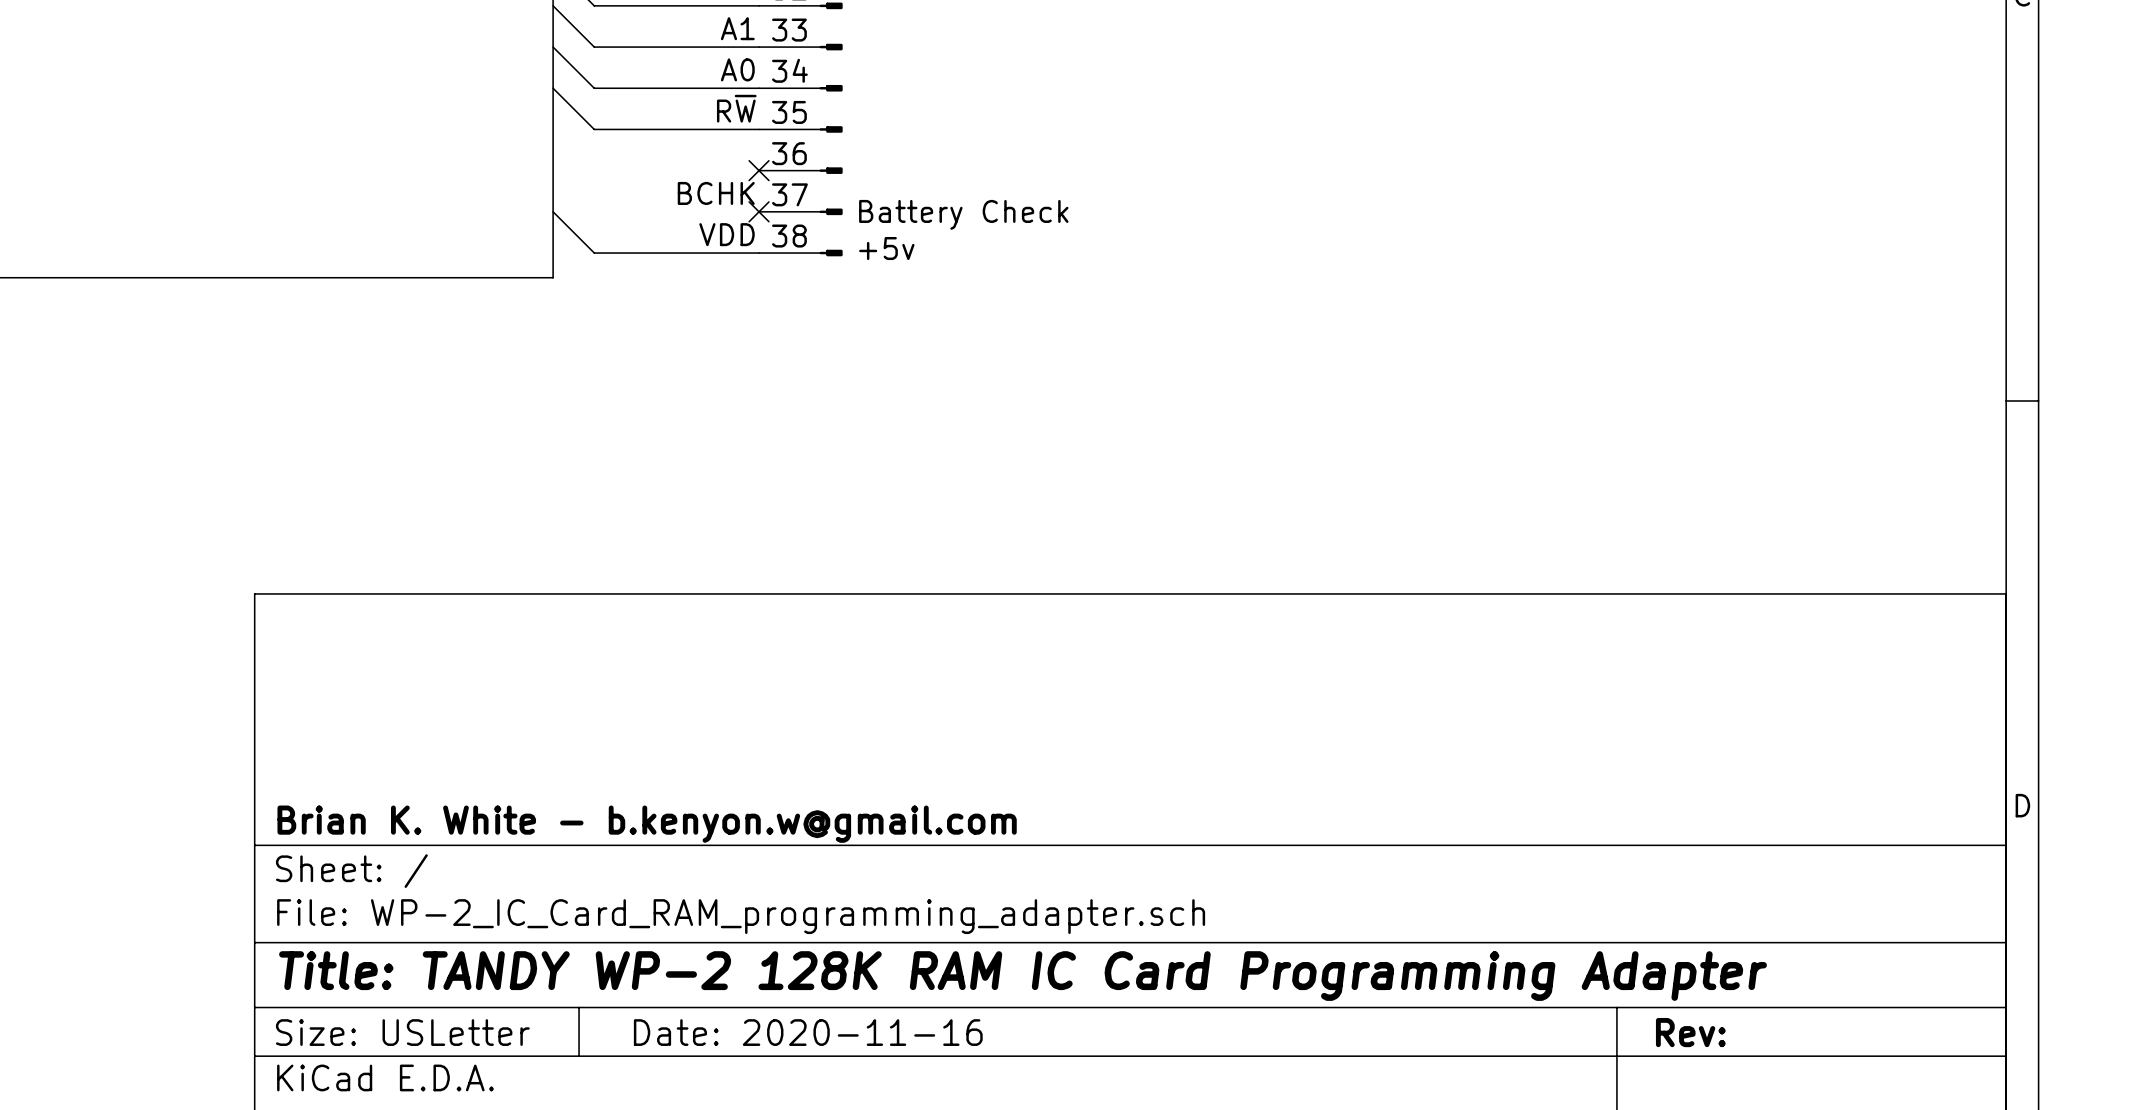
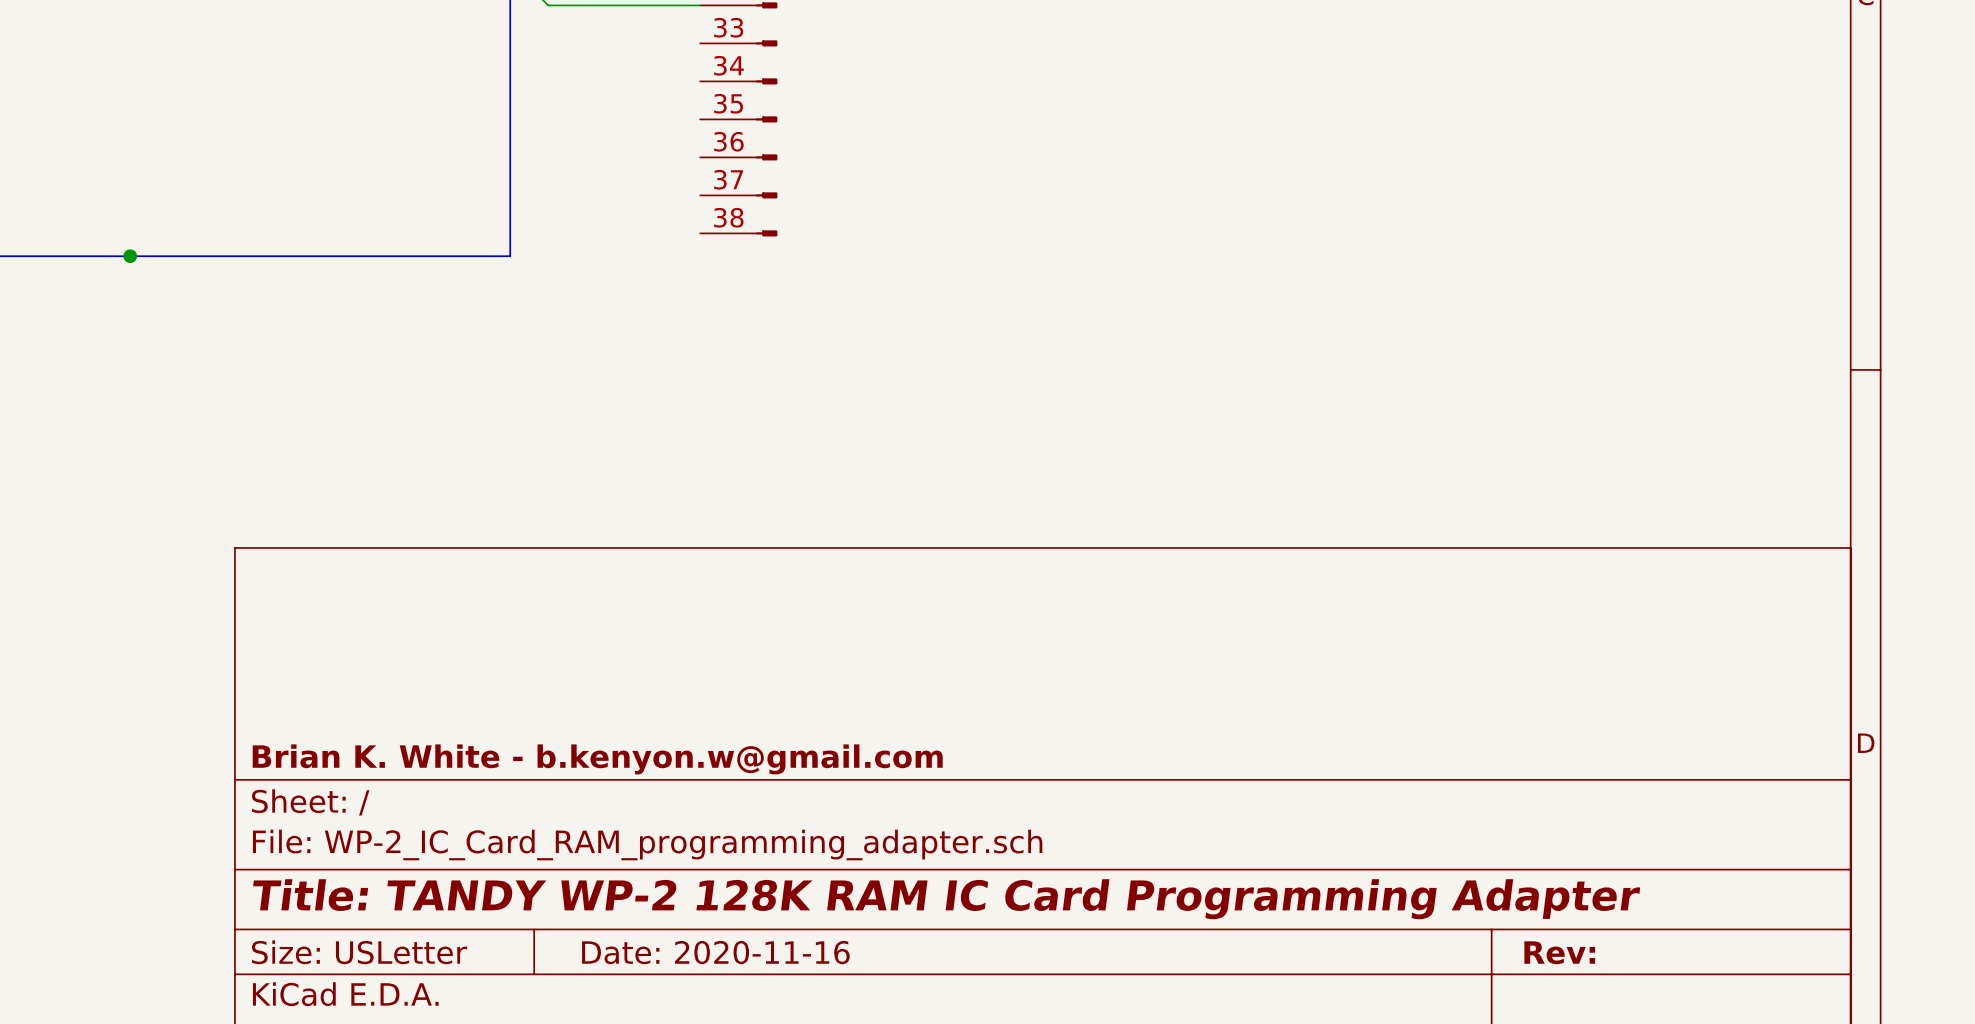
wire: (553, 5) (594, 47) (759, 47) -> none
label: A1 (737, 28) -> none
wire: (553, 47) (594, 88) (759, 88) -> none
label: A0 (737, 69) -> none
wire: (553, 88) (594, 129) (759, 129) -> none
label: R~{W} (736, 108) -> none
no-connect mark: (759, 170) -> none
label: BCHK (716, 193) -> none
wire: (553, 211) (594, 253) (759, 253) -> none
no-connect mark: (759, 211) -> none
text: Battery Check (963, 214) -> none
label: VDD (727, 234) -> none
text: +5v (886, 248) -> none
junction: none -> (130, 256)

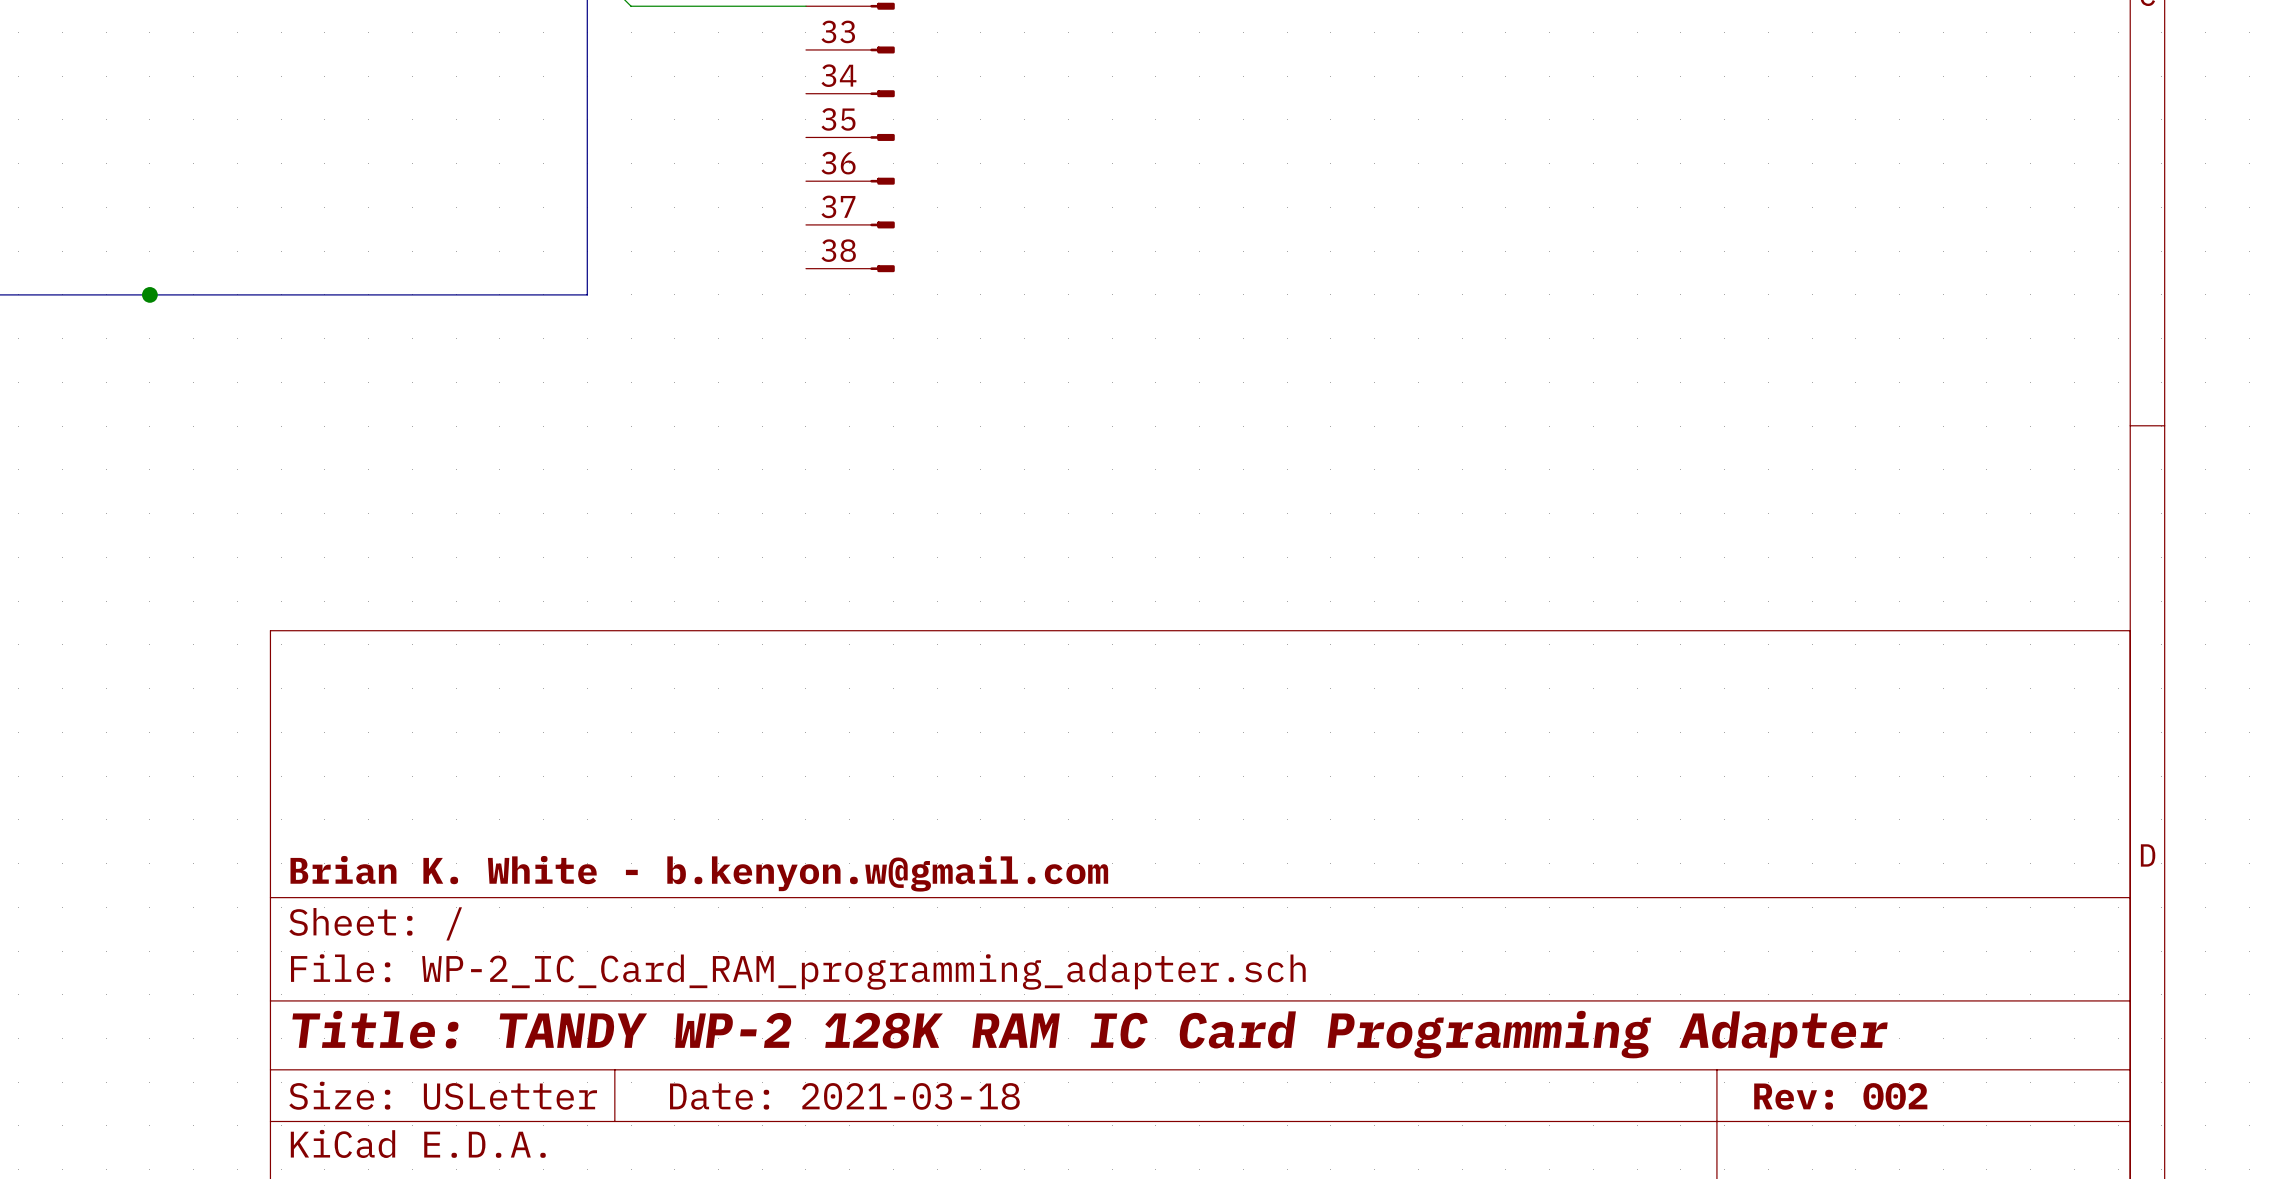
title block: Date: 2020-11-16 (715, 952) -> Date: 2021-03-18 (844, 1096)
title block: Rev: (1559, 952) -> Rev: 002 (1840, 1096)

